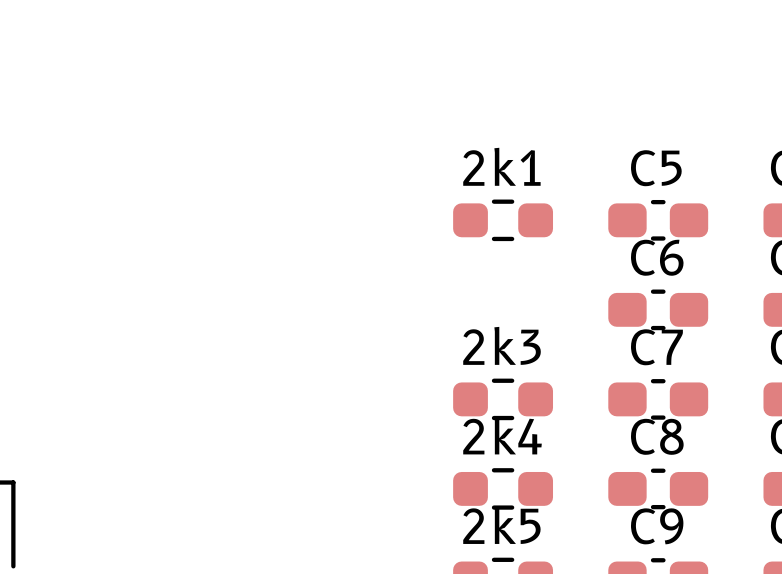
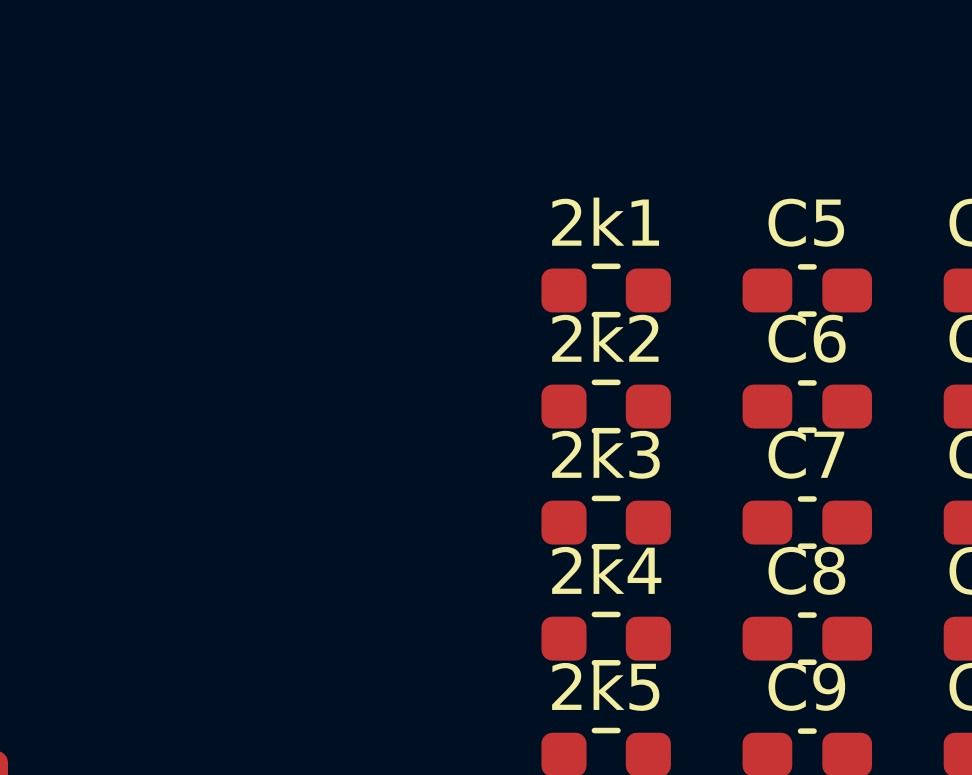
2k2: none -> (606, 406)

